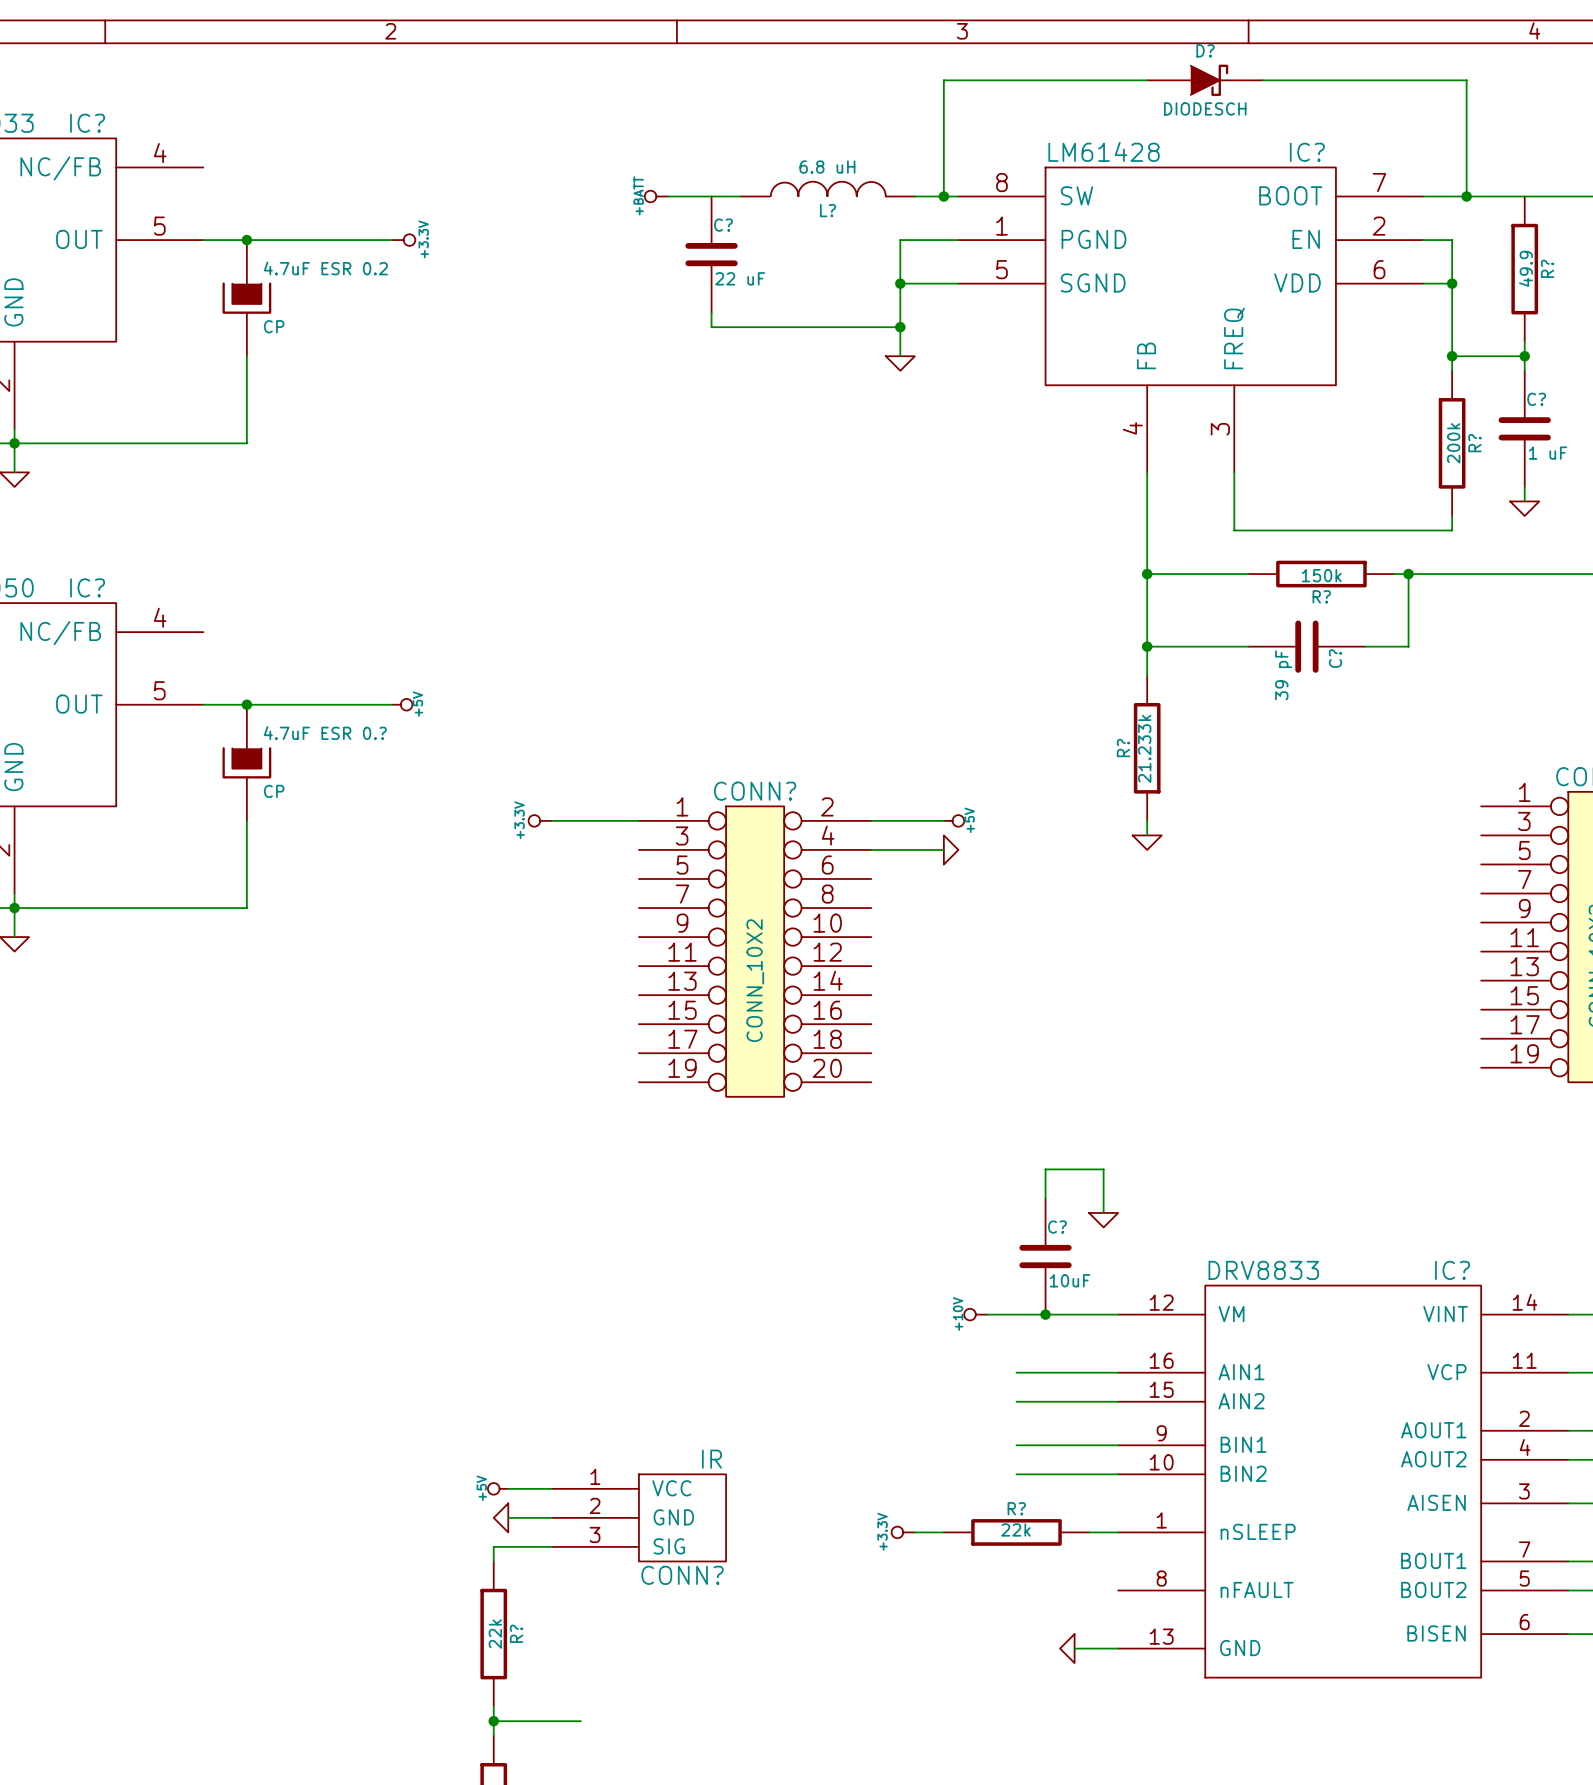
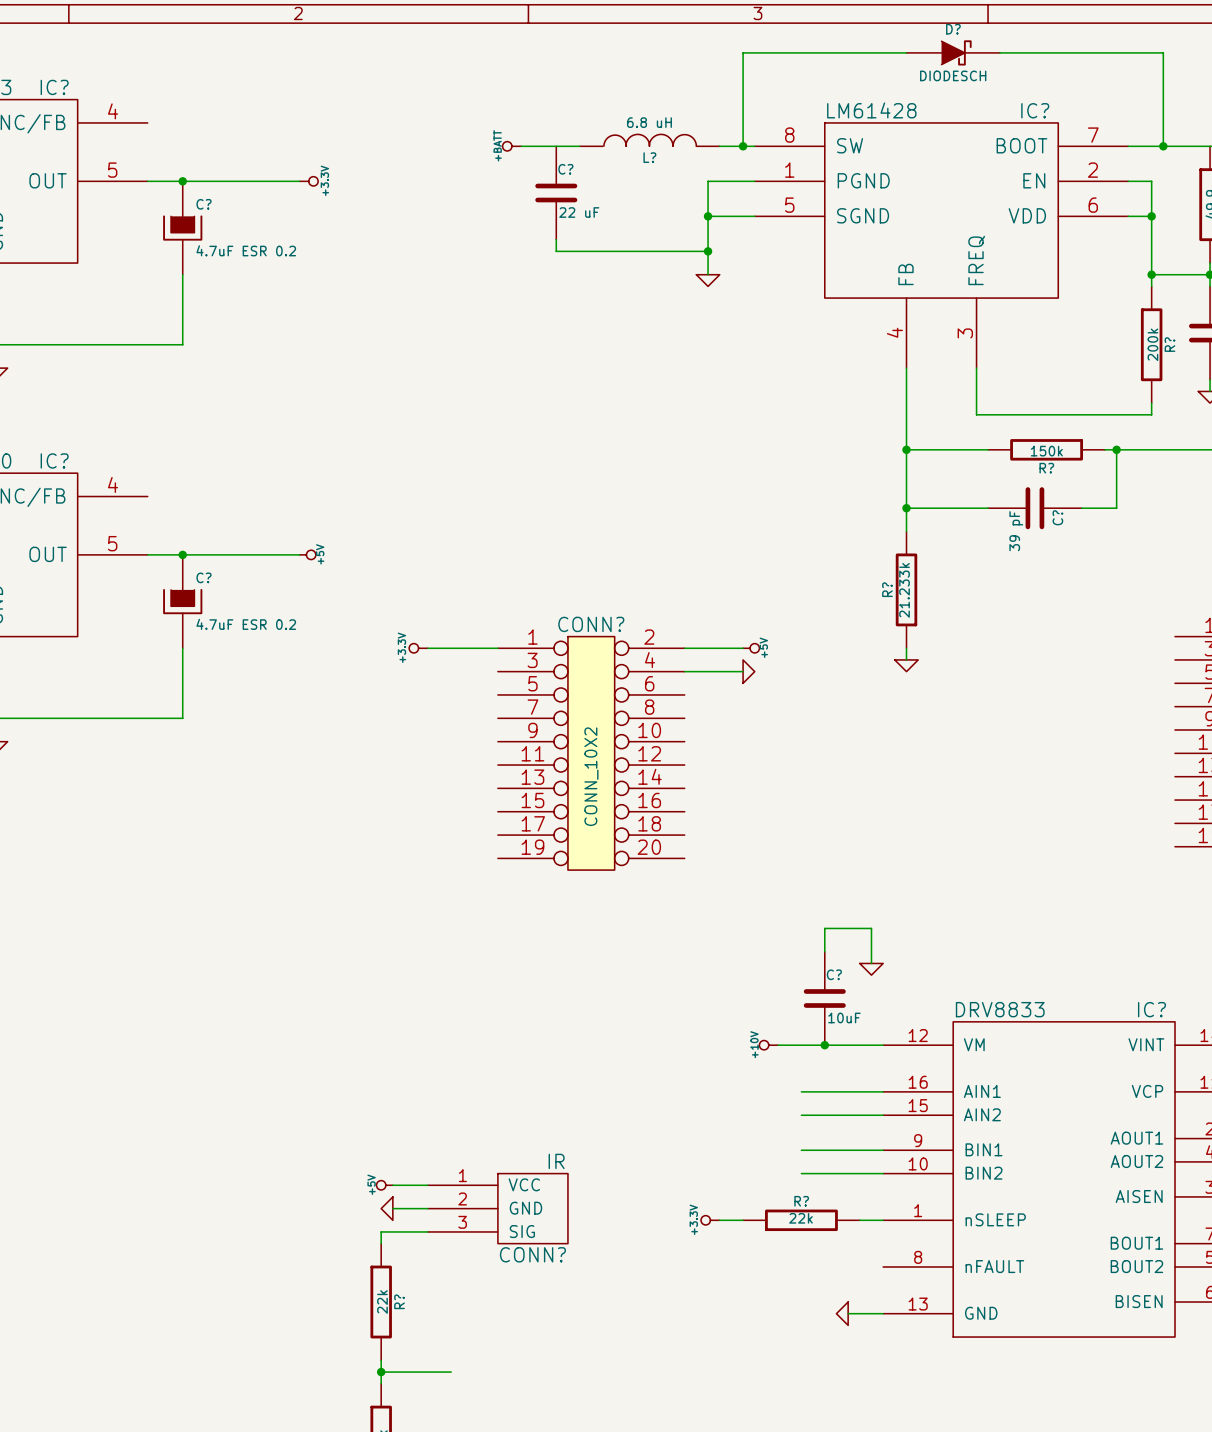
4.7uF ESR 0.2 name: 4.7uF ESR 0.2 (325, 268) -> C? (203, 204)
4.7uF ESR 0.2 value: CP (274, 326) -> 4.7uF ESR 0.2 (246, 250)
4.7uF ESR 0.? name: 4.7uF ESR 0.? (325, 733) -> C? (203, 577)
4.7uF ESR 0.? value: CP (274, 791) -> 4.7uF ESR 0.2 (246, 624)

